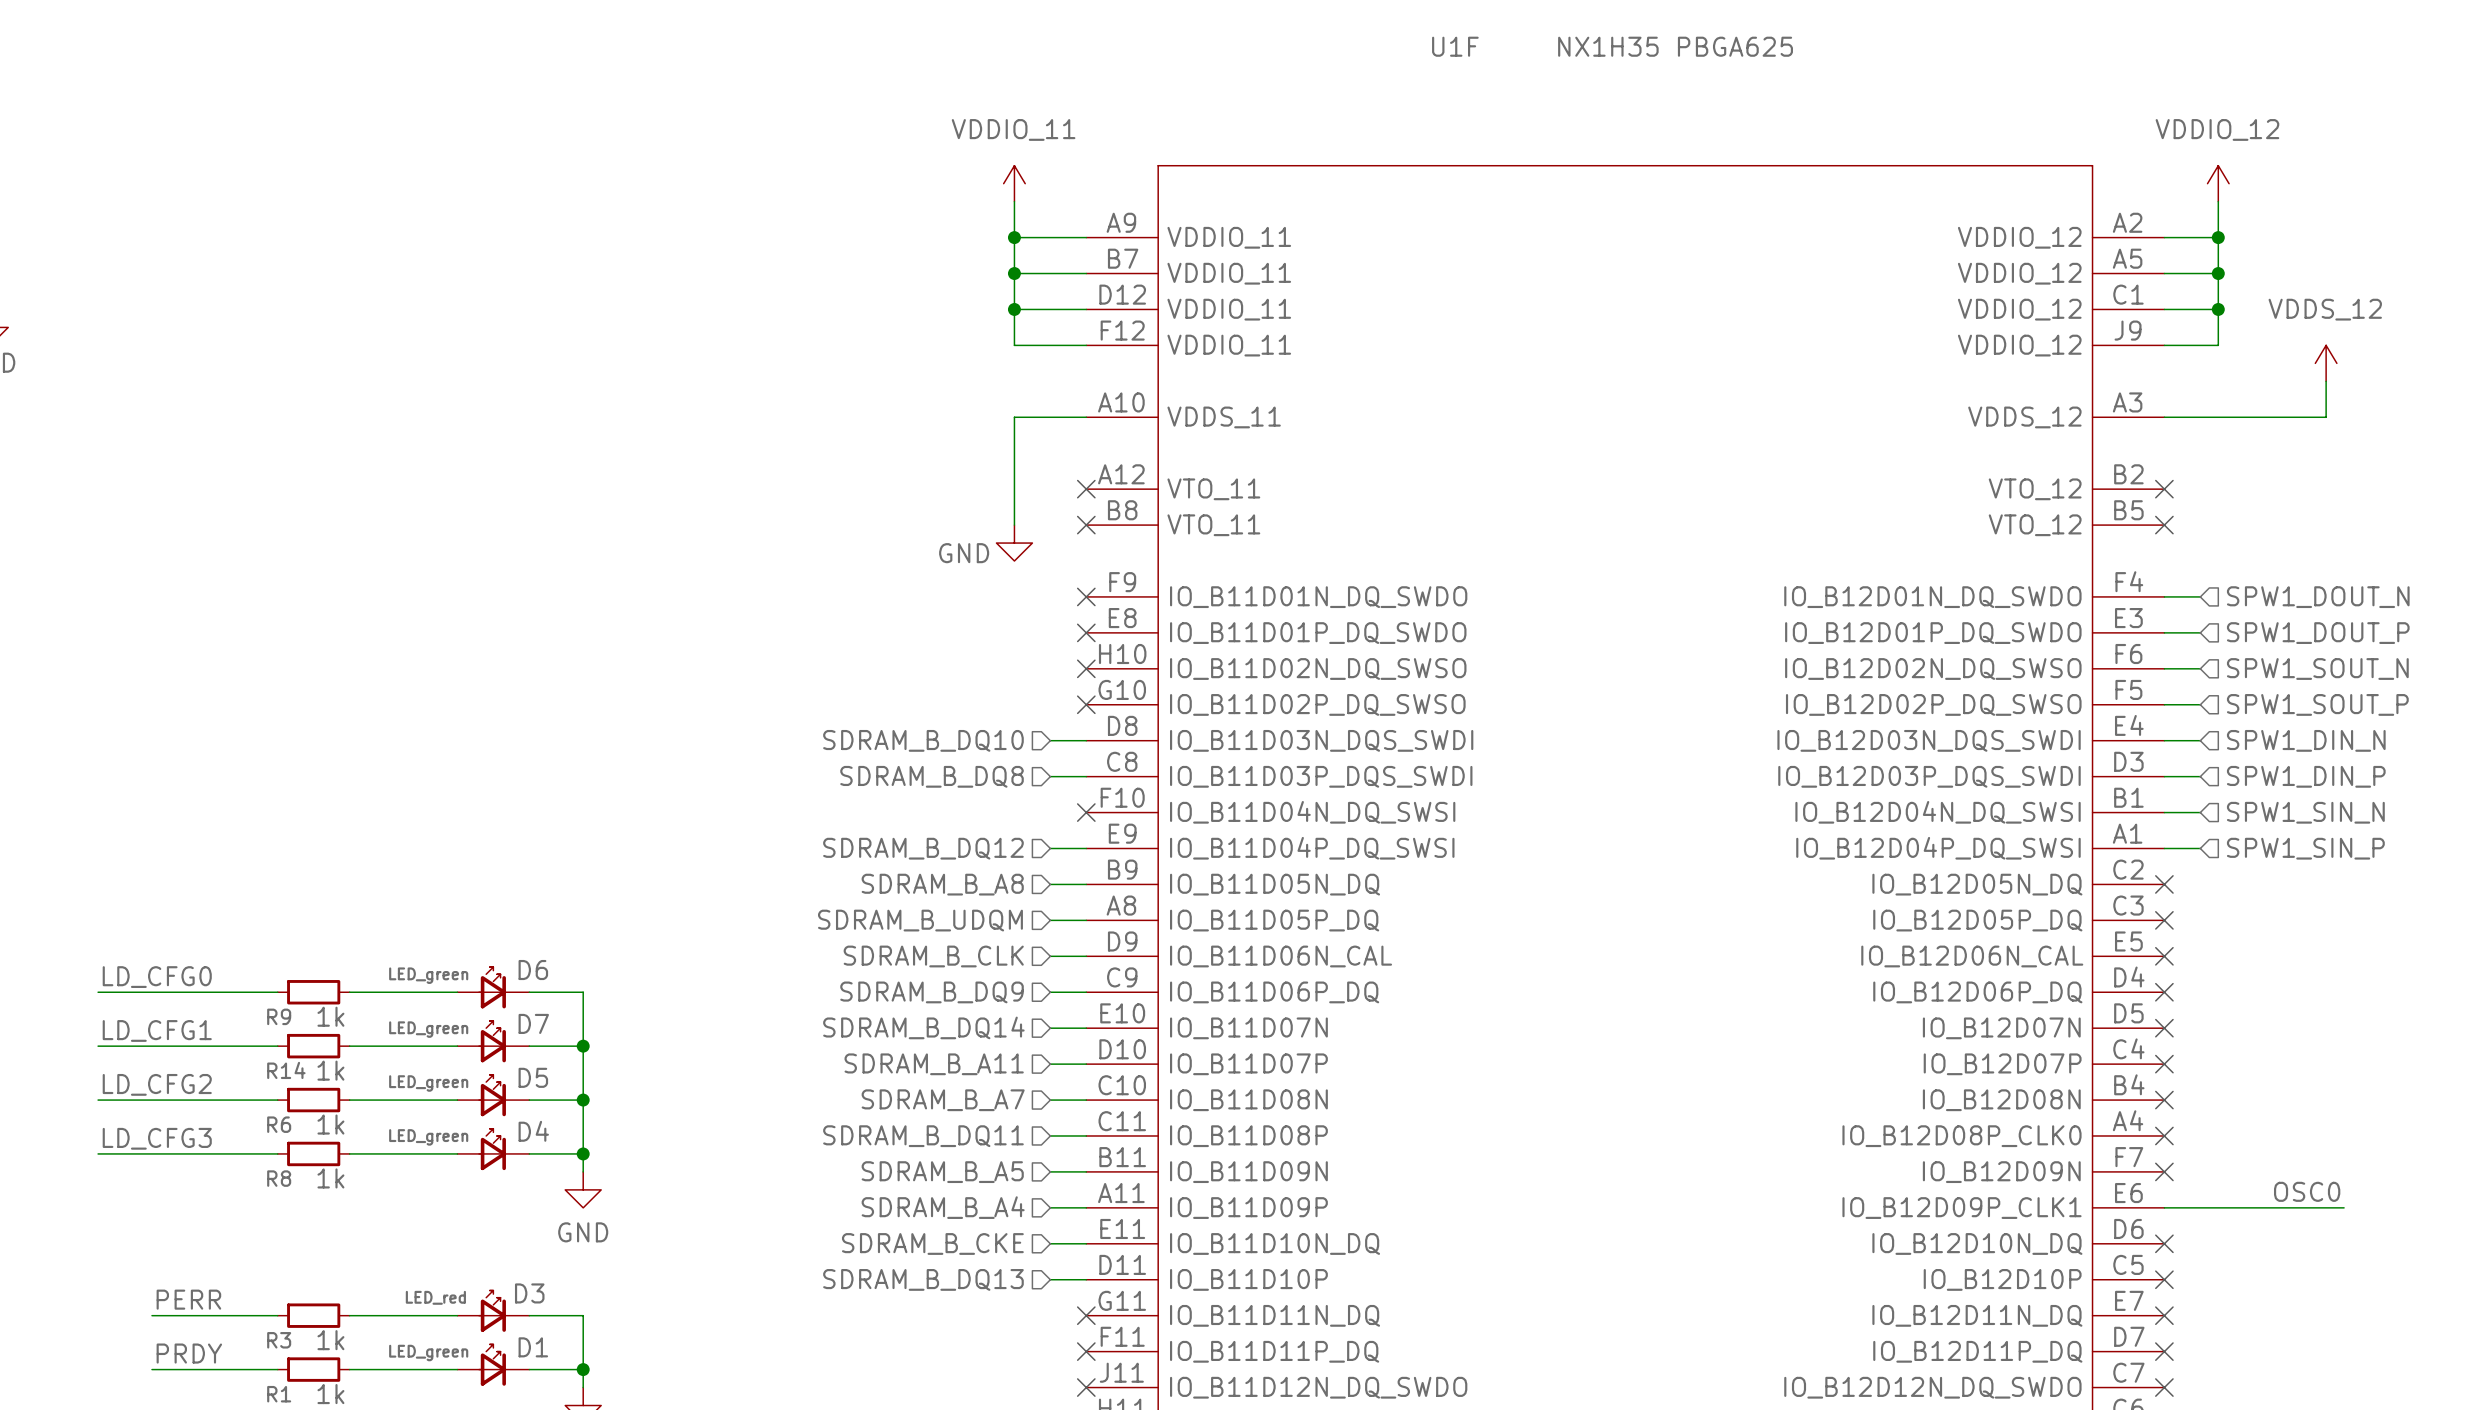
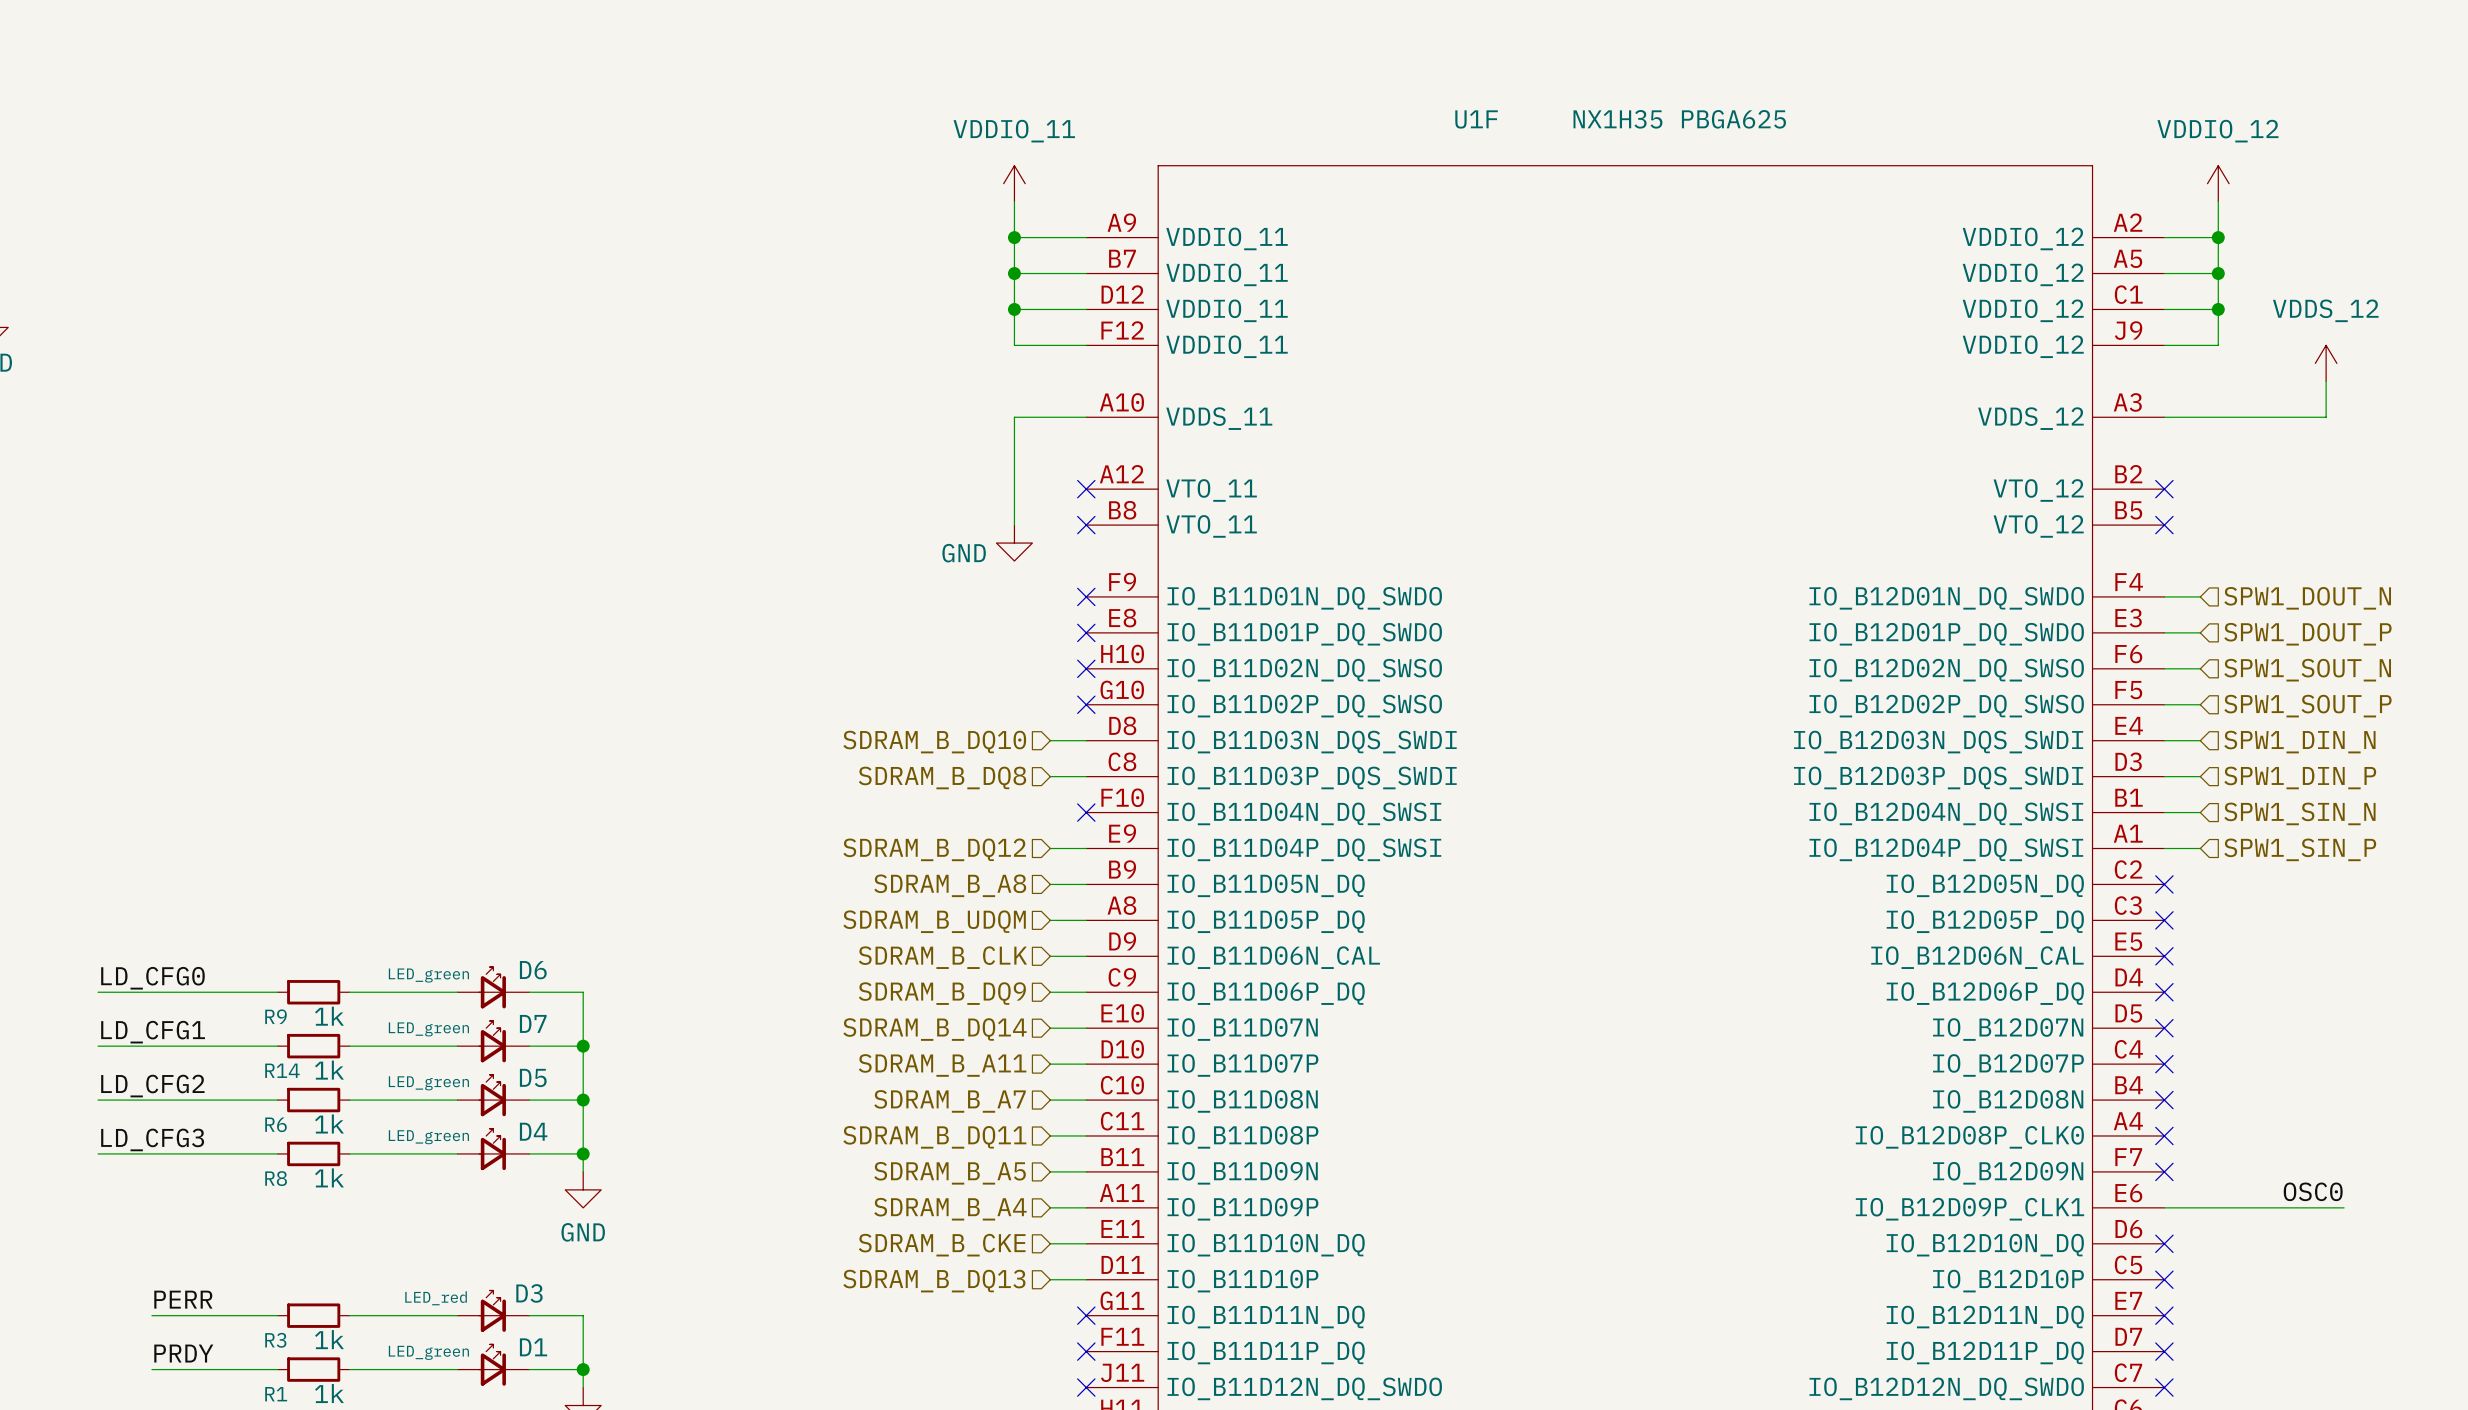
U1F name position: U1F (1455, 46) -> U1F (1476, 119)
U1F value position: NX1H35 PBGA625 (1675, 46) -> NX1H35 PBGA625 (1679, 119)

